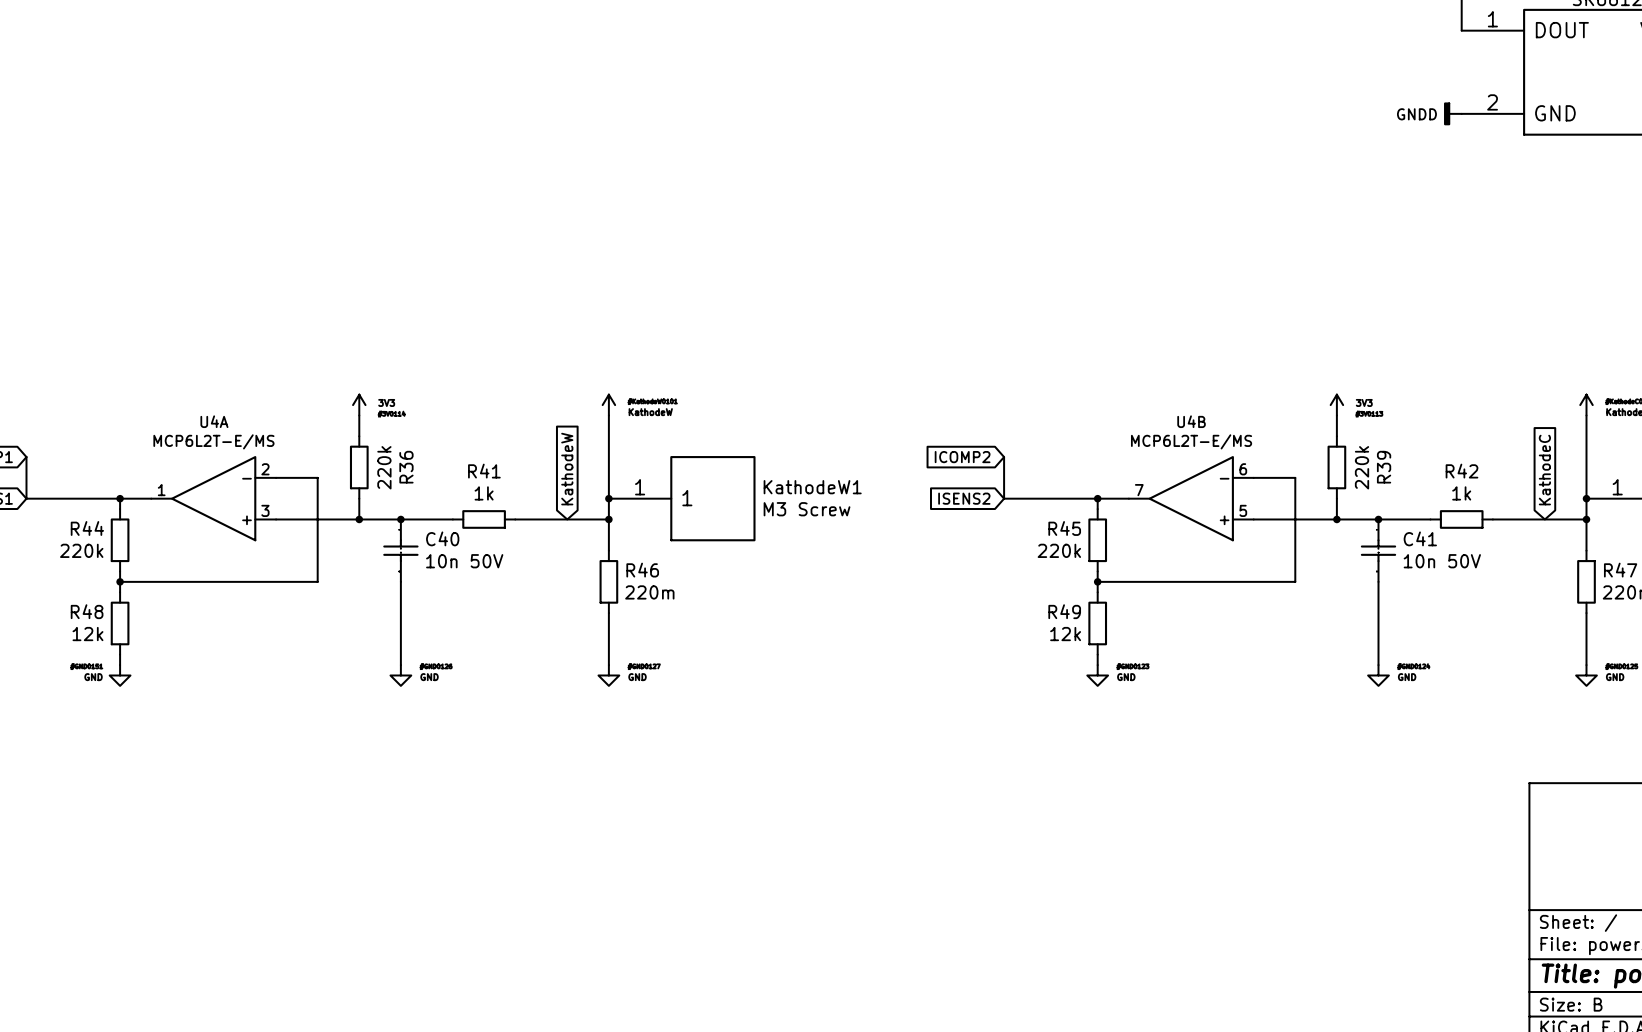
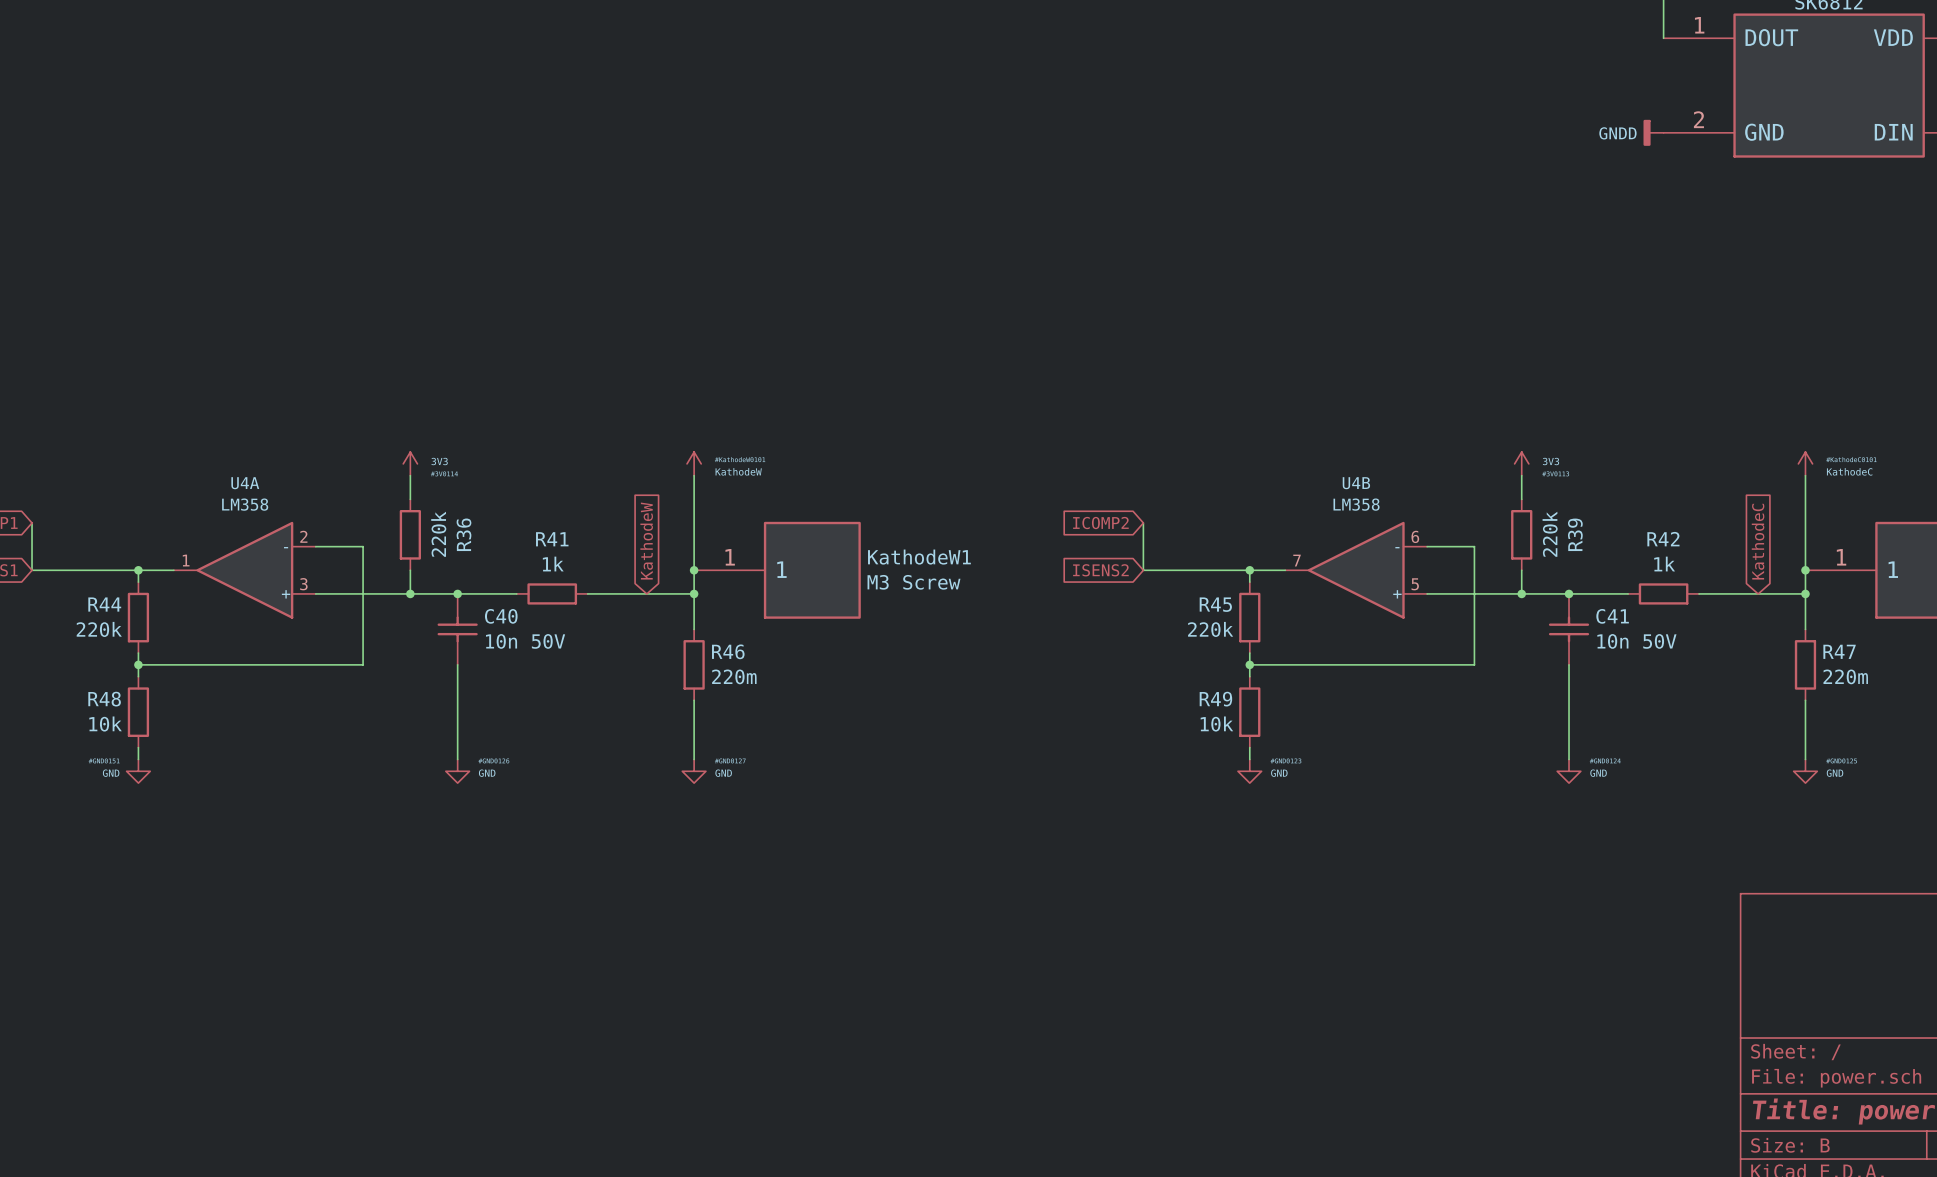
U4A value: MCP6L2T-E/MS (213, 441) -> LM358 (245, 504)
U4B value: MCP6L2T-E/MS (1191, 441) -> LM358 (1356, 504)
R48 value: 12k (87, 634) -> 10k (105, 724)
R49 value: 12k (1065, 634) -> 10k (1216, 724)

